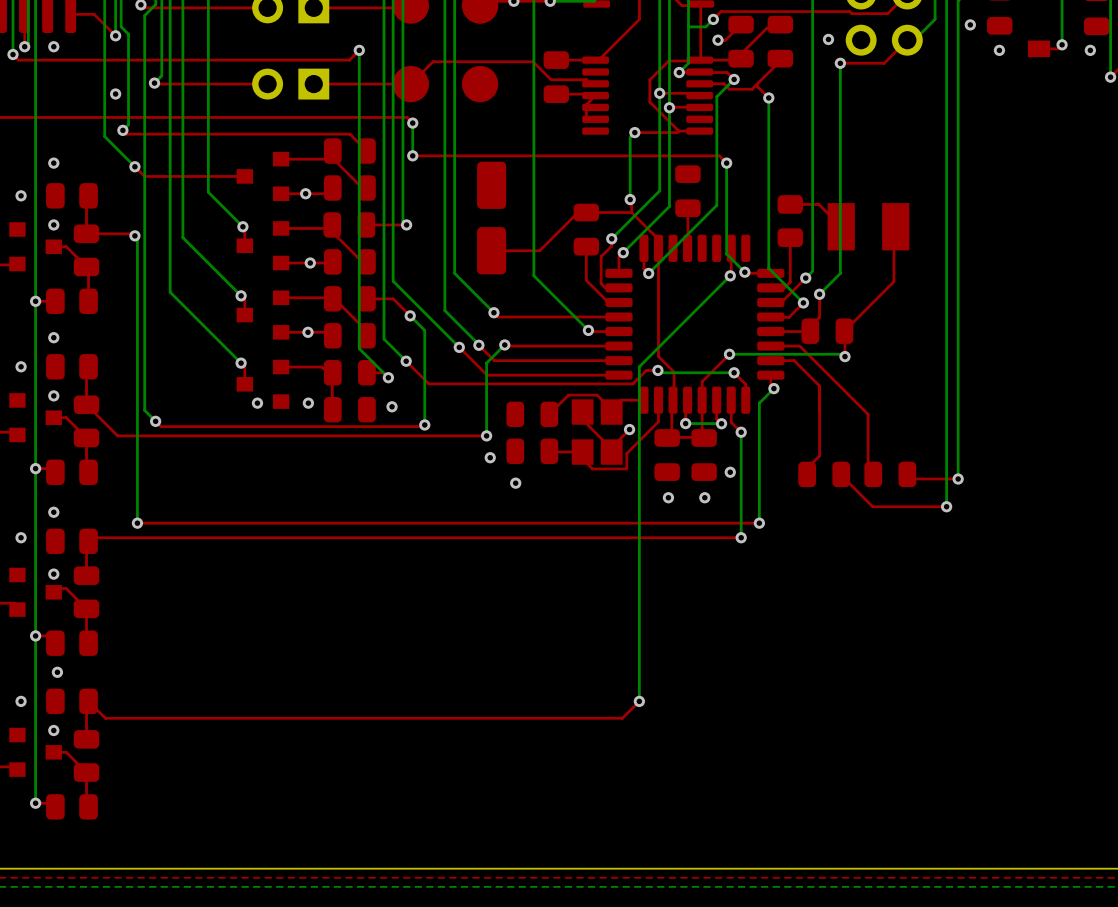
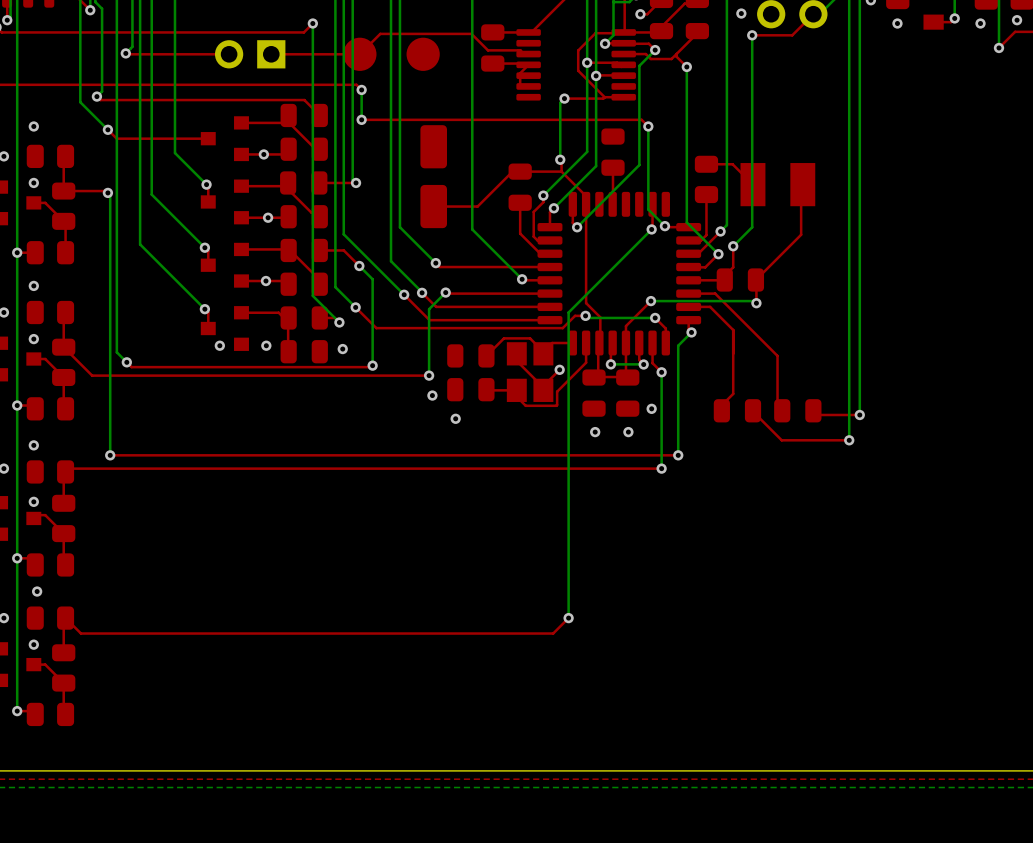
via: (53, 46) -> none
via: (115, 94) -> none

